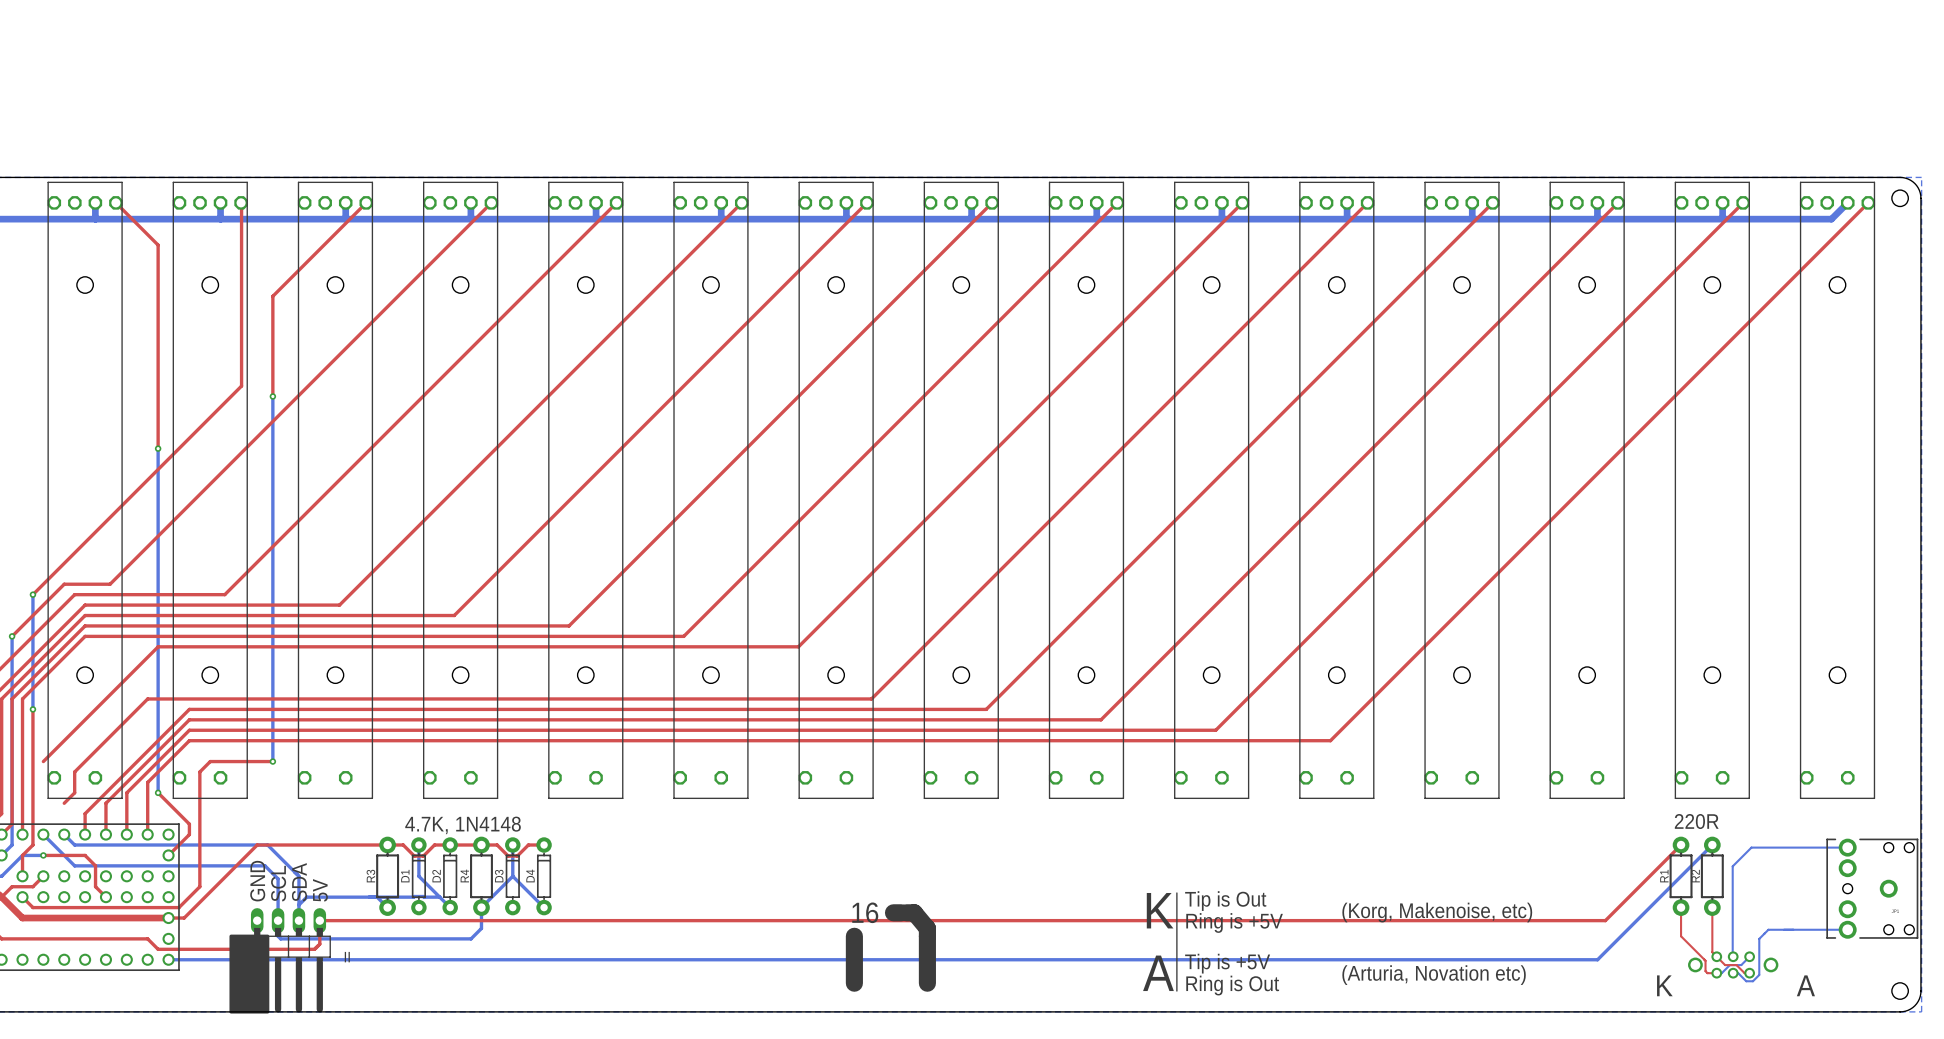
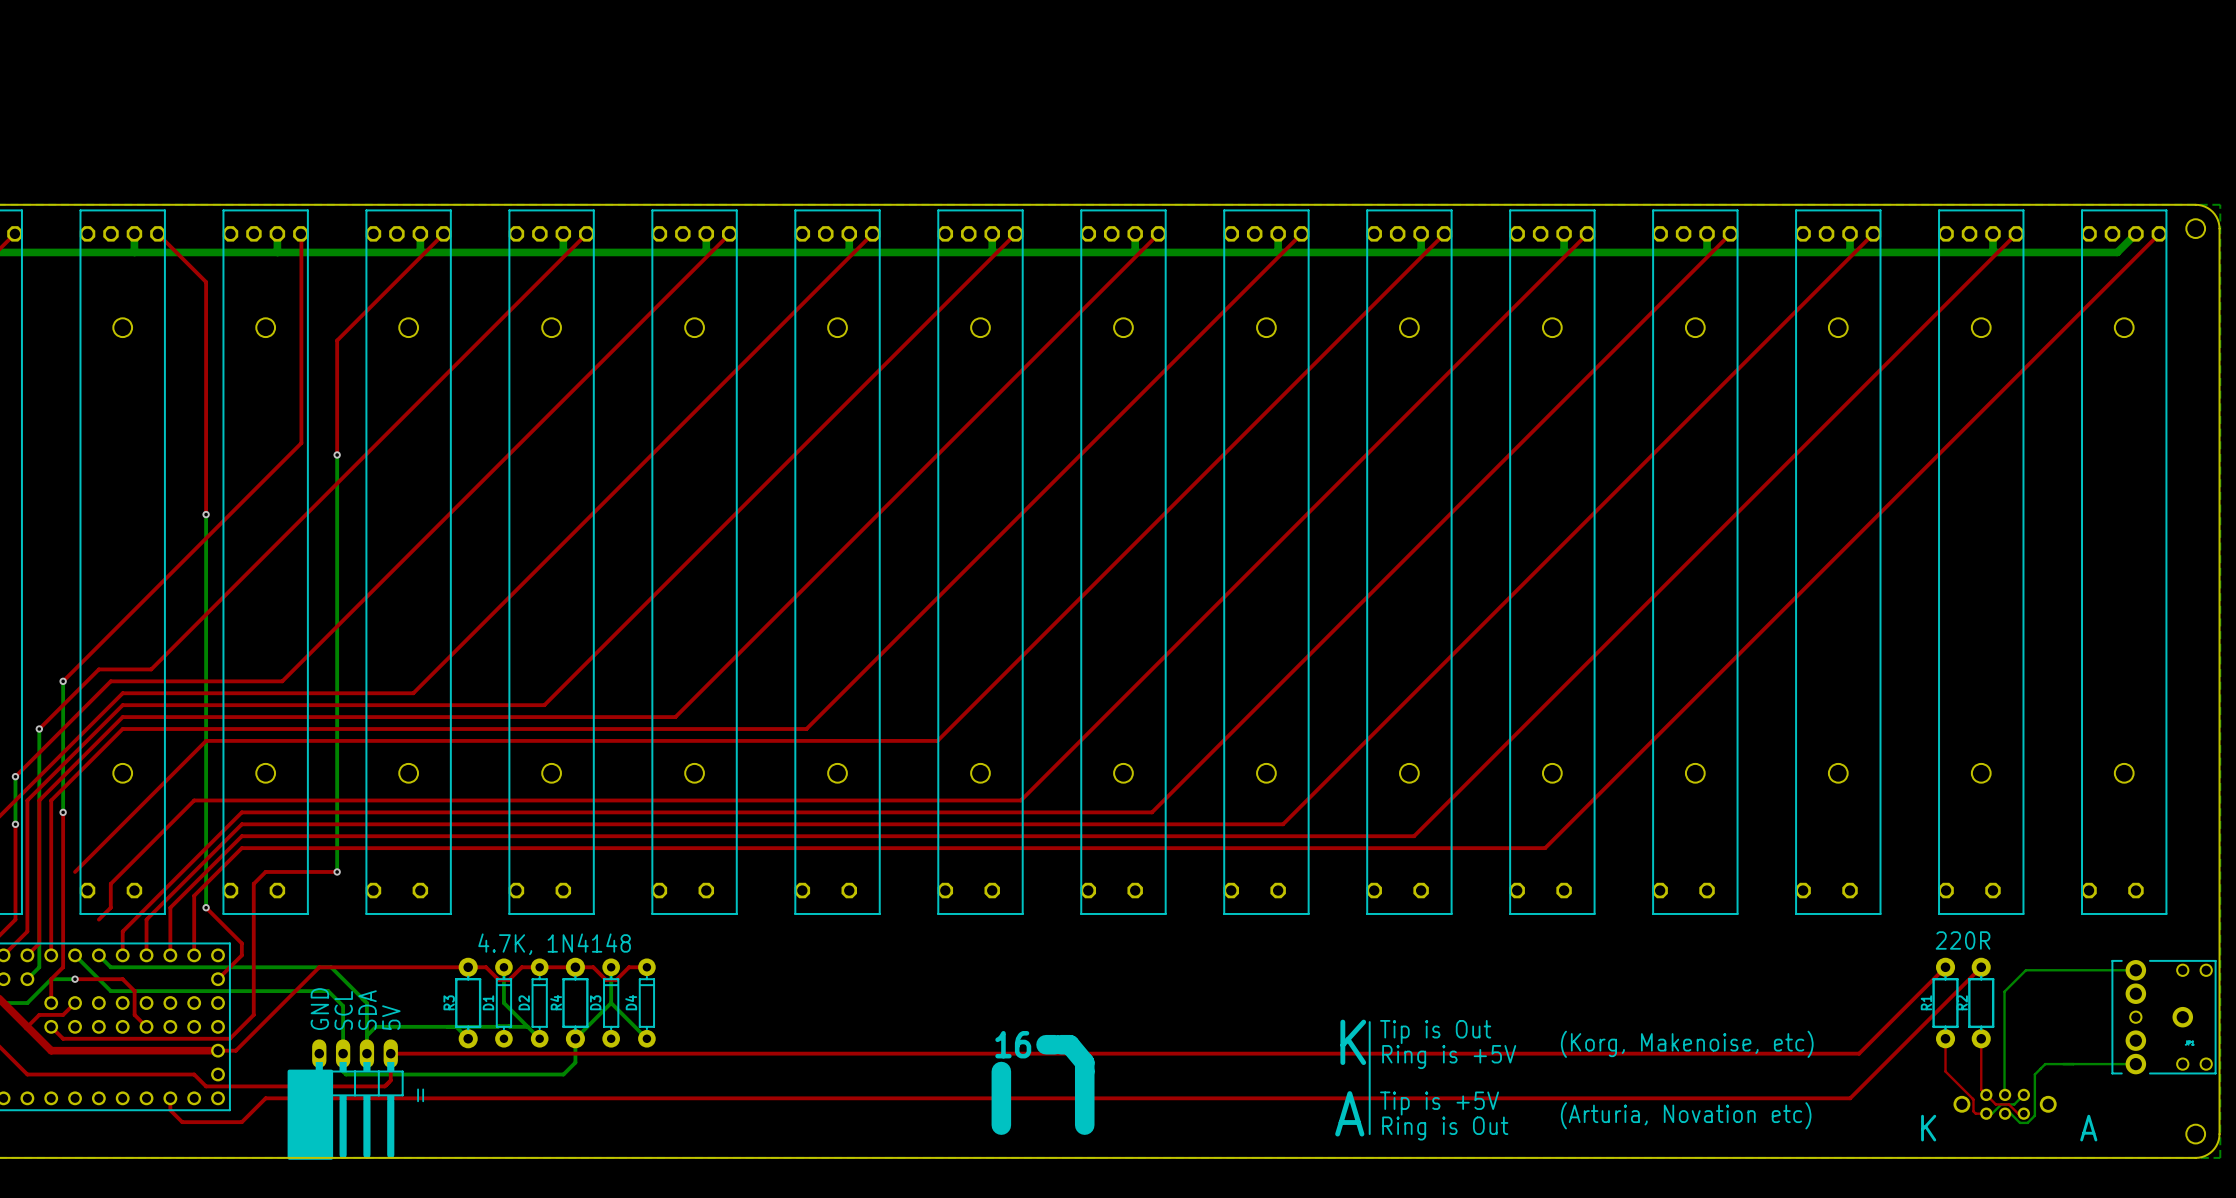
bottom track: (1712, 845) (1597, 959) (168, 959) -> none
top track: none -> (1981, 967) (1850, 1098) (265, 1098) (241, 1122) (182, 1122) (170, 1110) (170, 1098)

